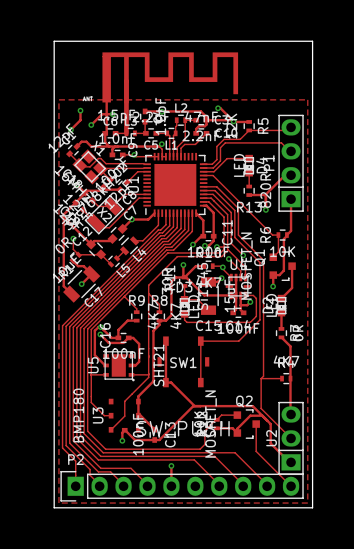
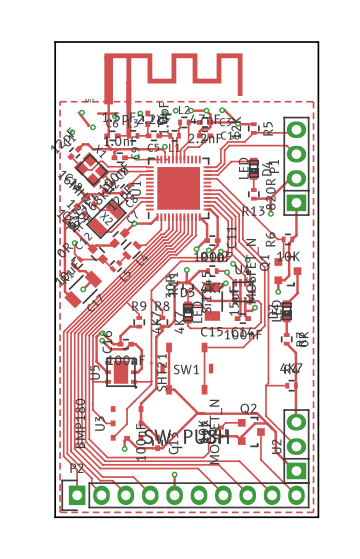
via: none -> (175, 110)
via: none -> (191, 110)
via: none -> (206, 110)
track: none -> (78, 112) (88, 126)
track: (80, 110) (80, 120) (70, 129) -> none
track: none -> (98, 113) (116, 113)
via: none -> (140, 113)
track: (145, 111) (200, 111) (206, 117) -> (191, 110) (206, 110) (210, 114) (210, 119)
track: (112, 114) (102, 114) (91, 124) -> none

